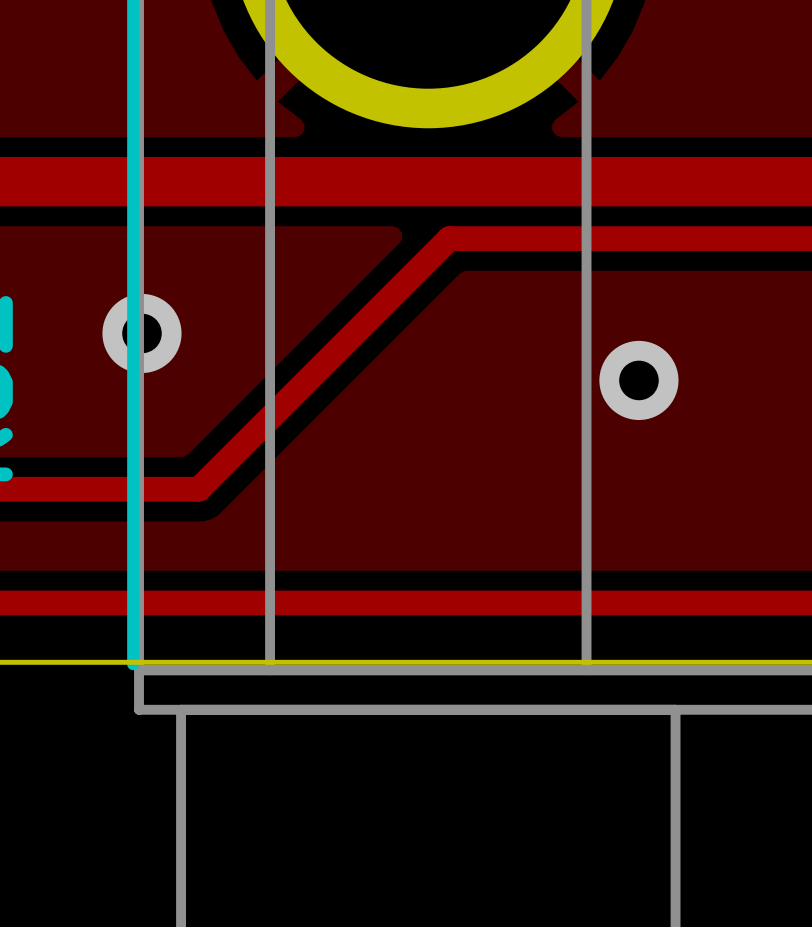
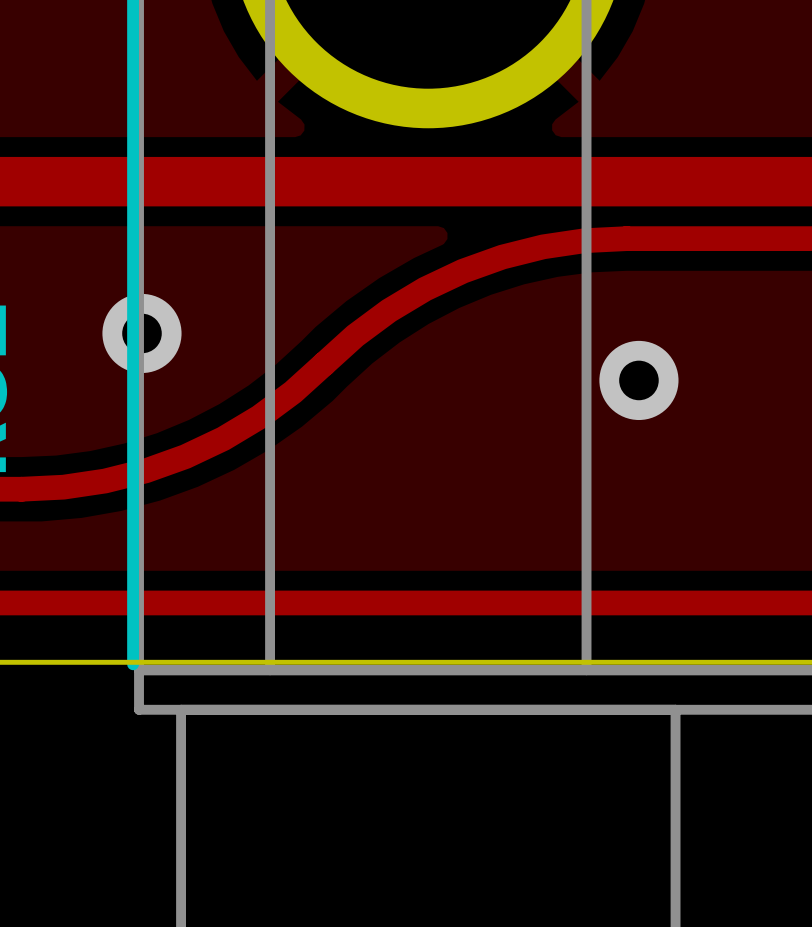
track: (626, 238) (449, 238) (198, 489) (21, 489) -> (626, 238) (584, 240) (543, 246) (502, 257) (462, 271) (424, 289) (388, 310) (355, 335) (293, 392) (259, 417) (223, 438) (185, 456) (145, 470) (105, 481) (63, 487) (21, 489)

